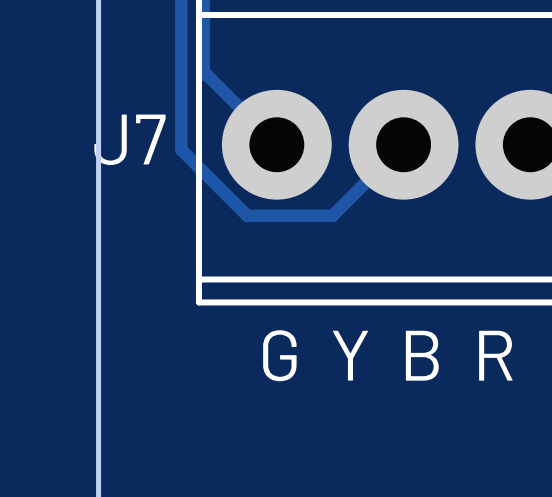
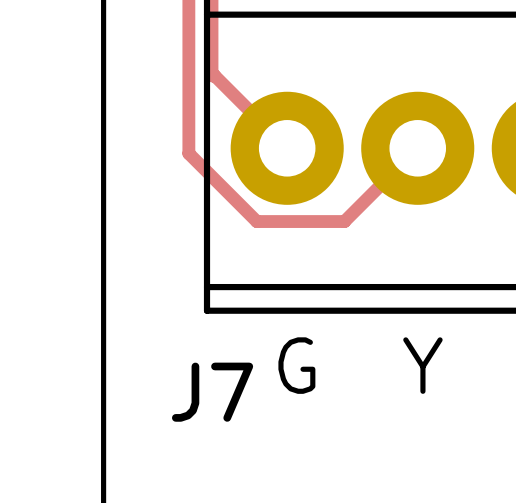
J7 name position: J7 (130, 139) -> J7 (212, 392)

